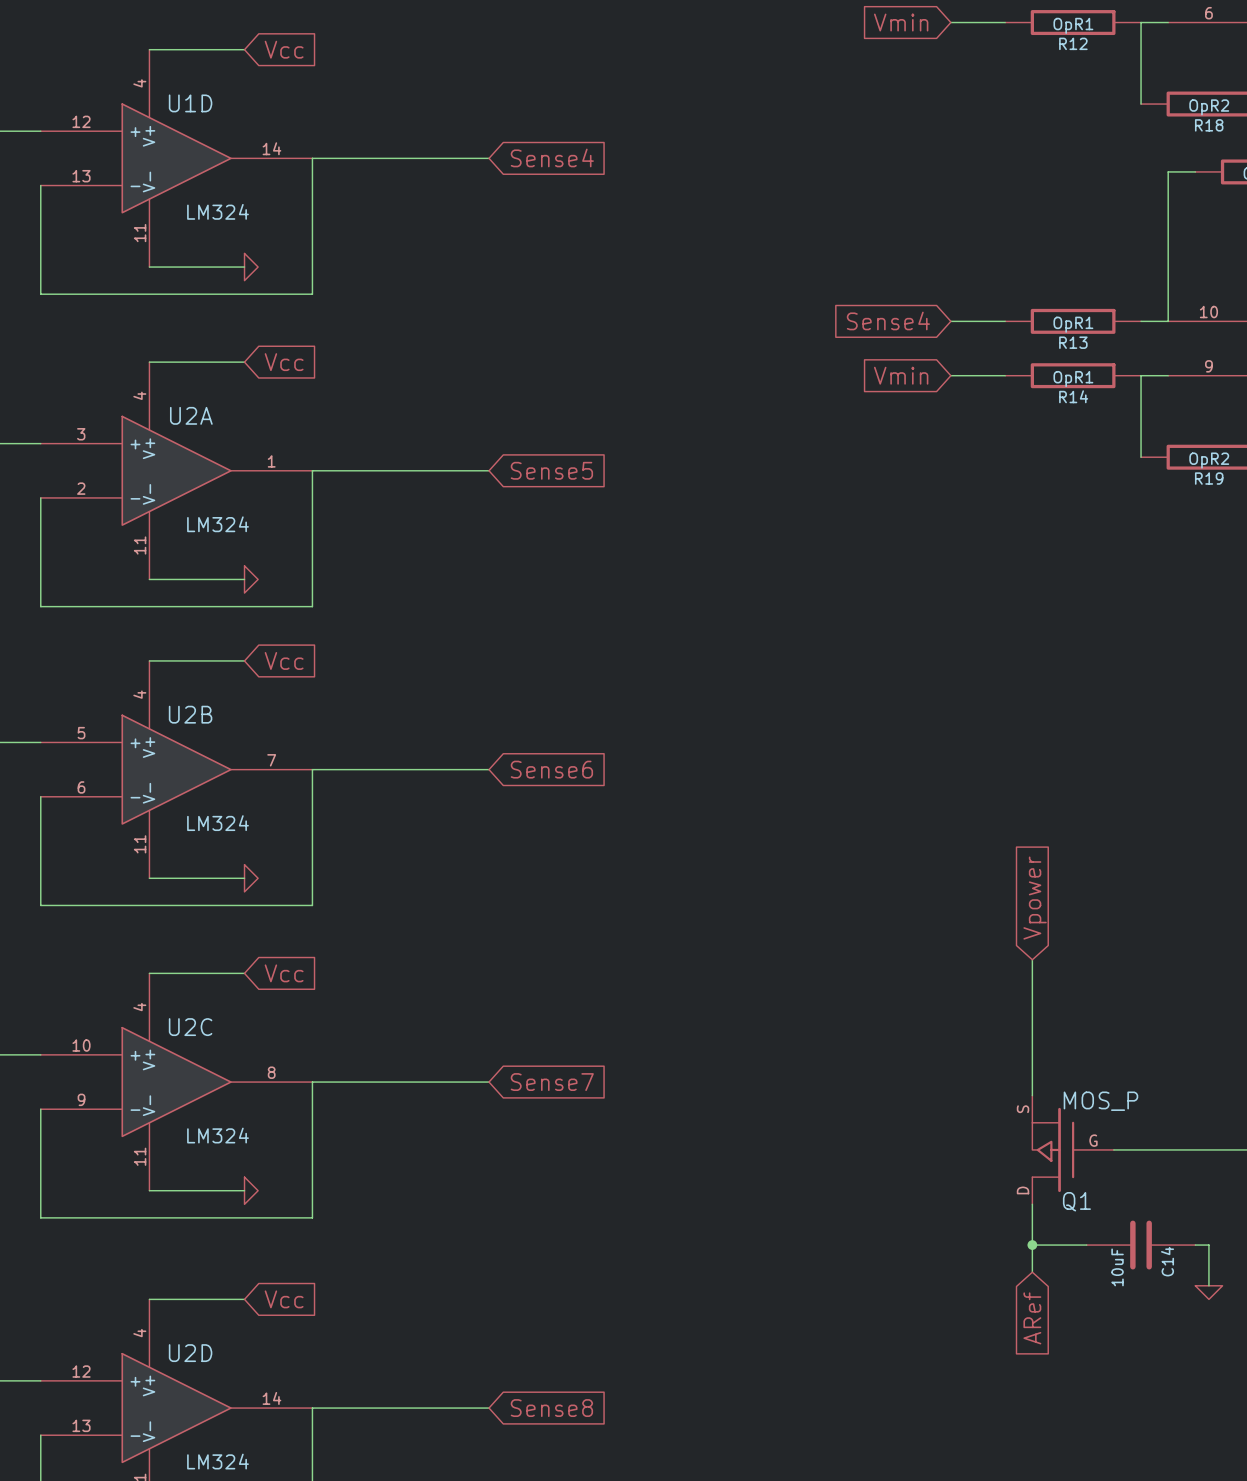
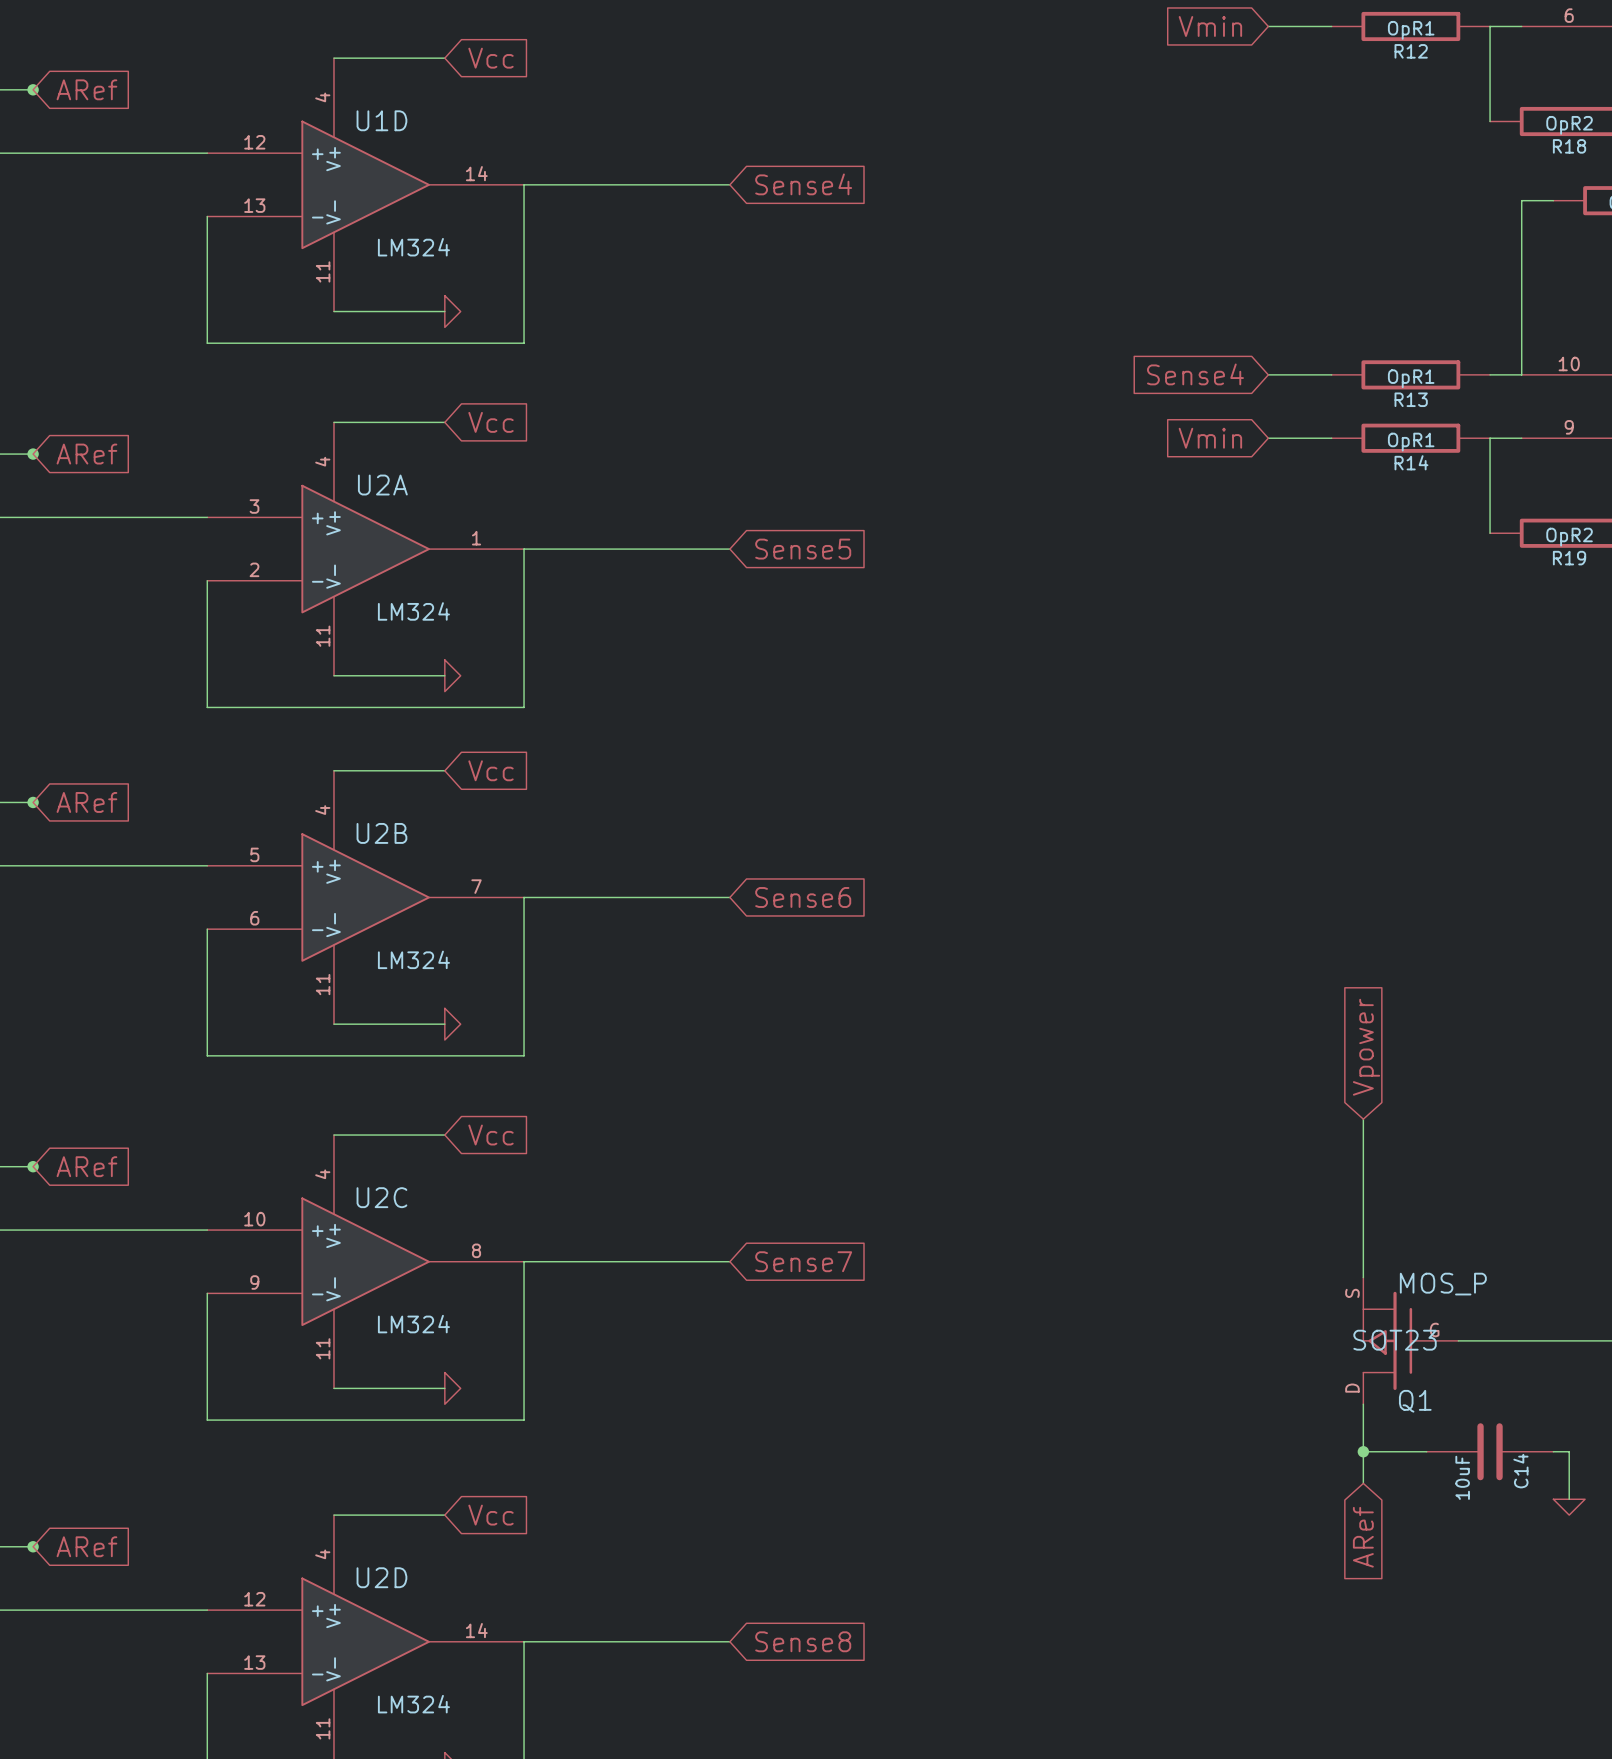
Q1 text: none -> SOT23 (1395, 1340)

